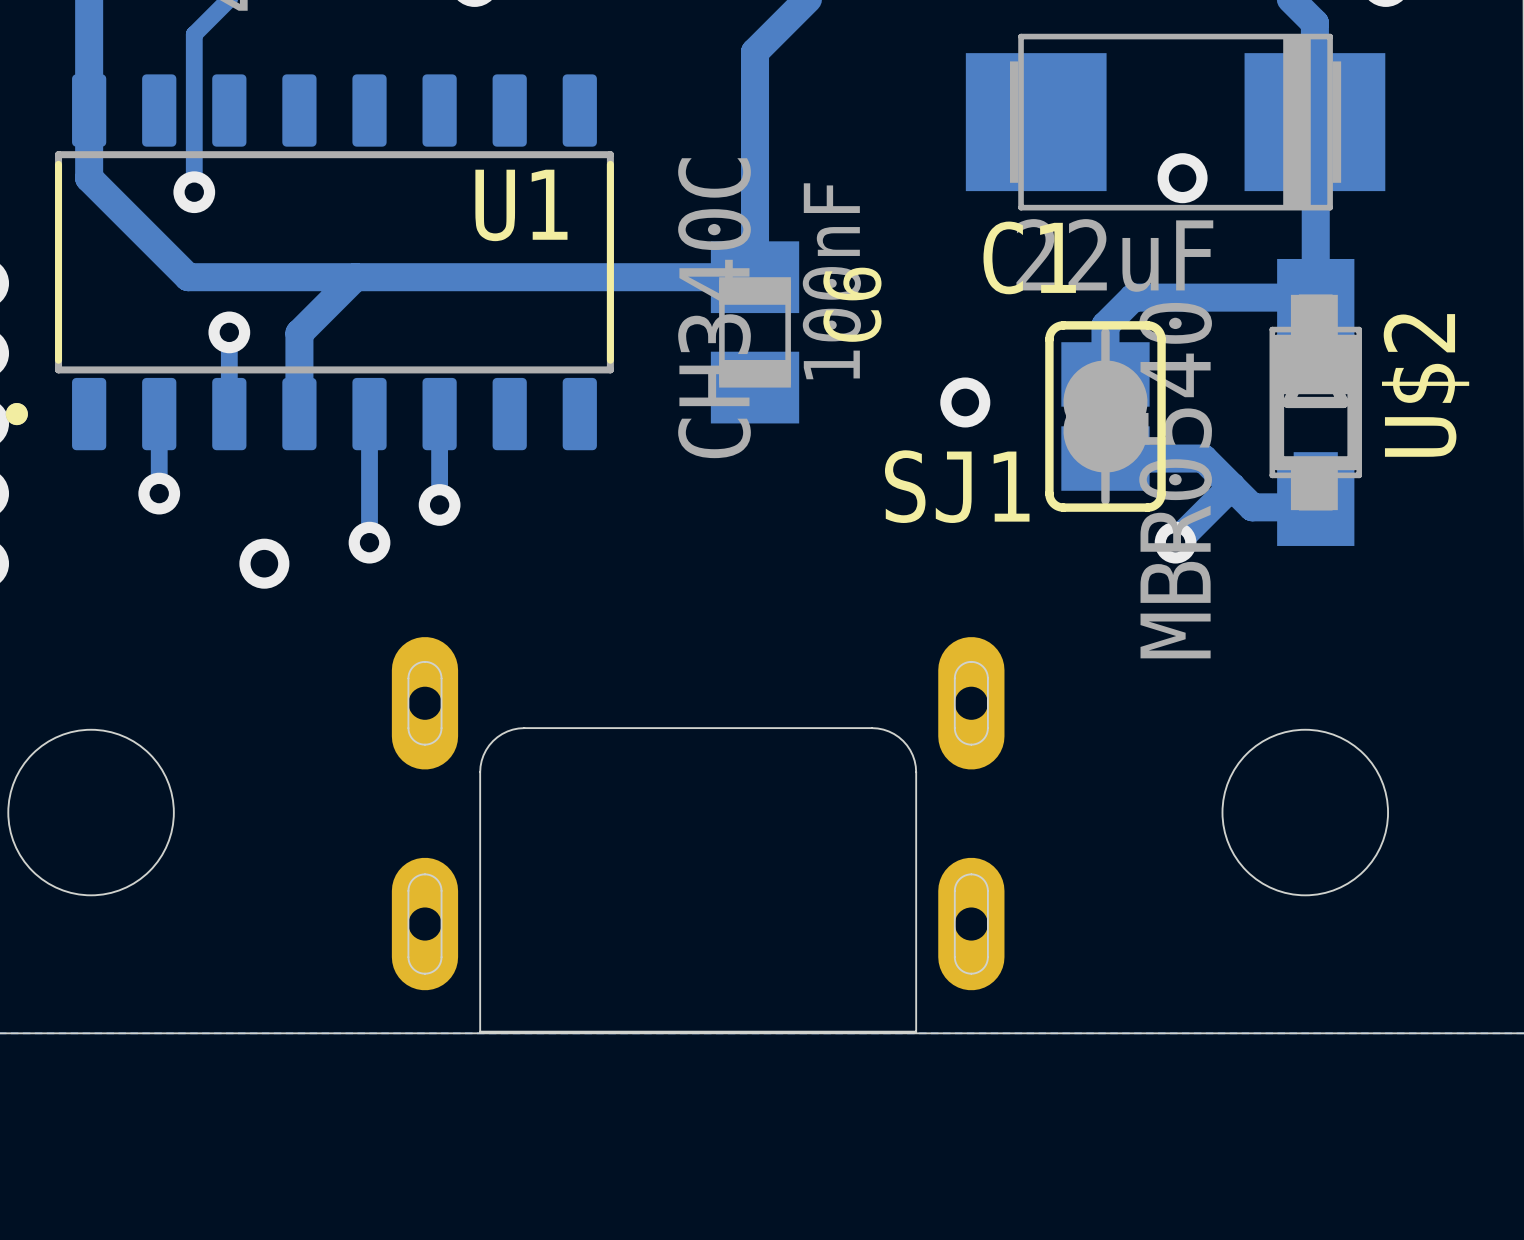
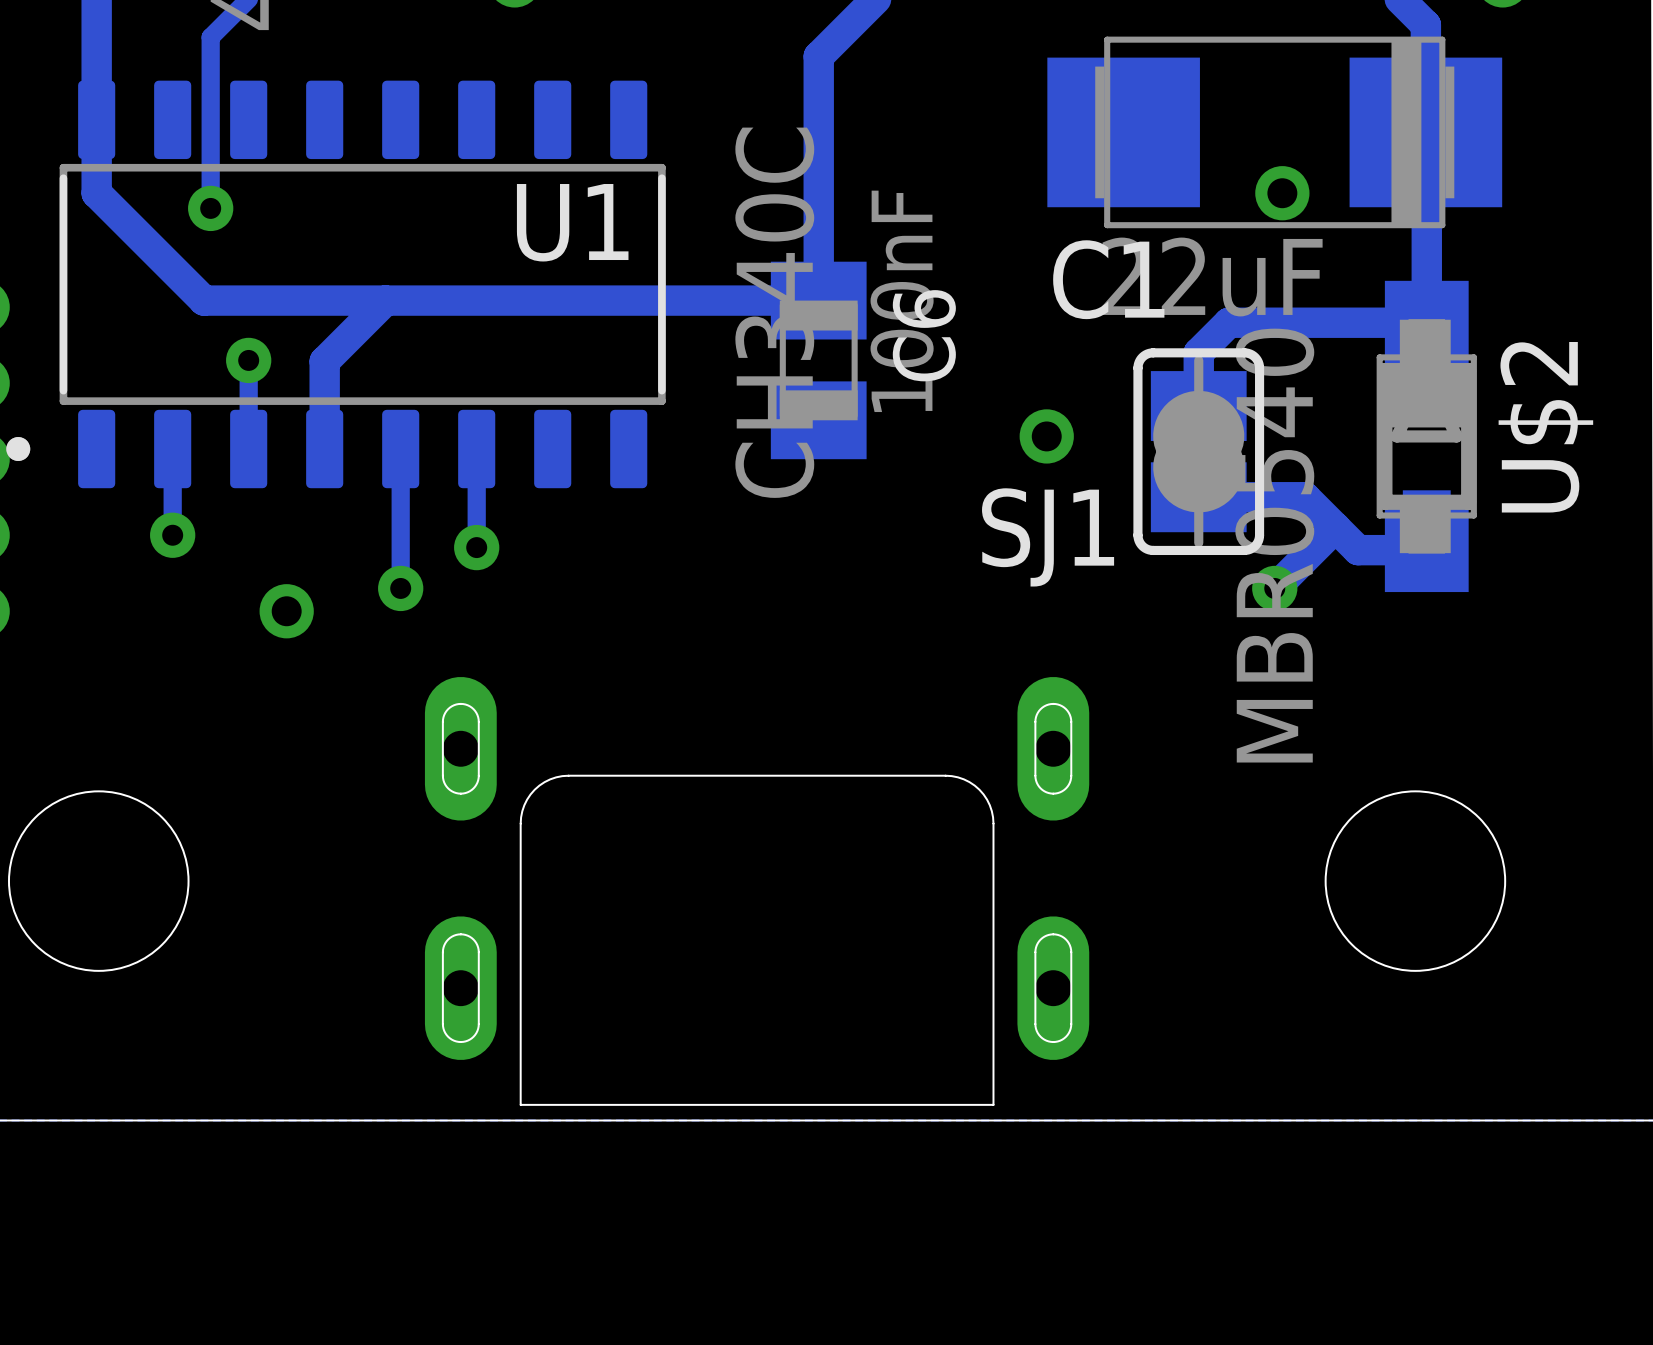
part position: (698, 834) -> (757, 890)

